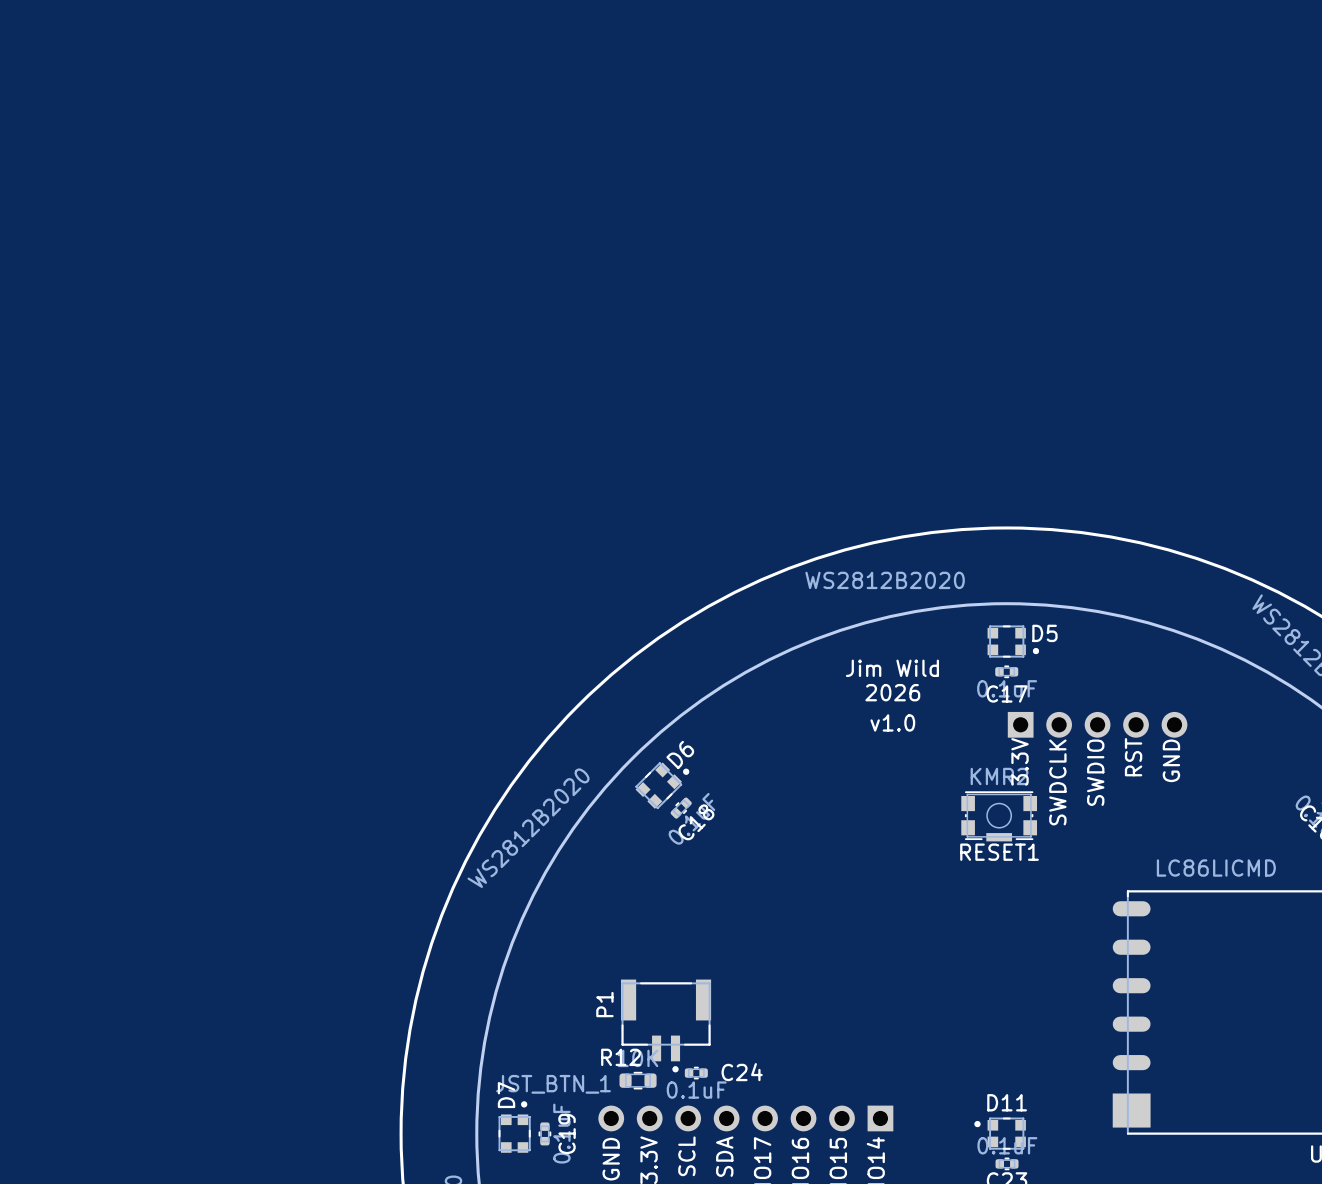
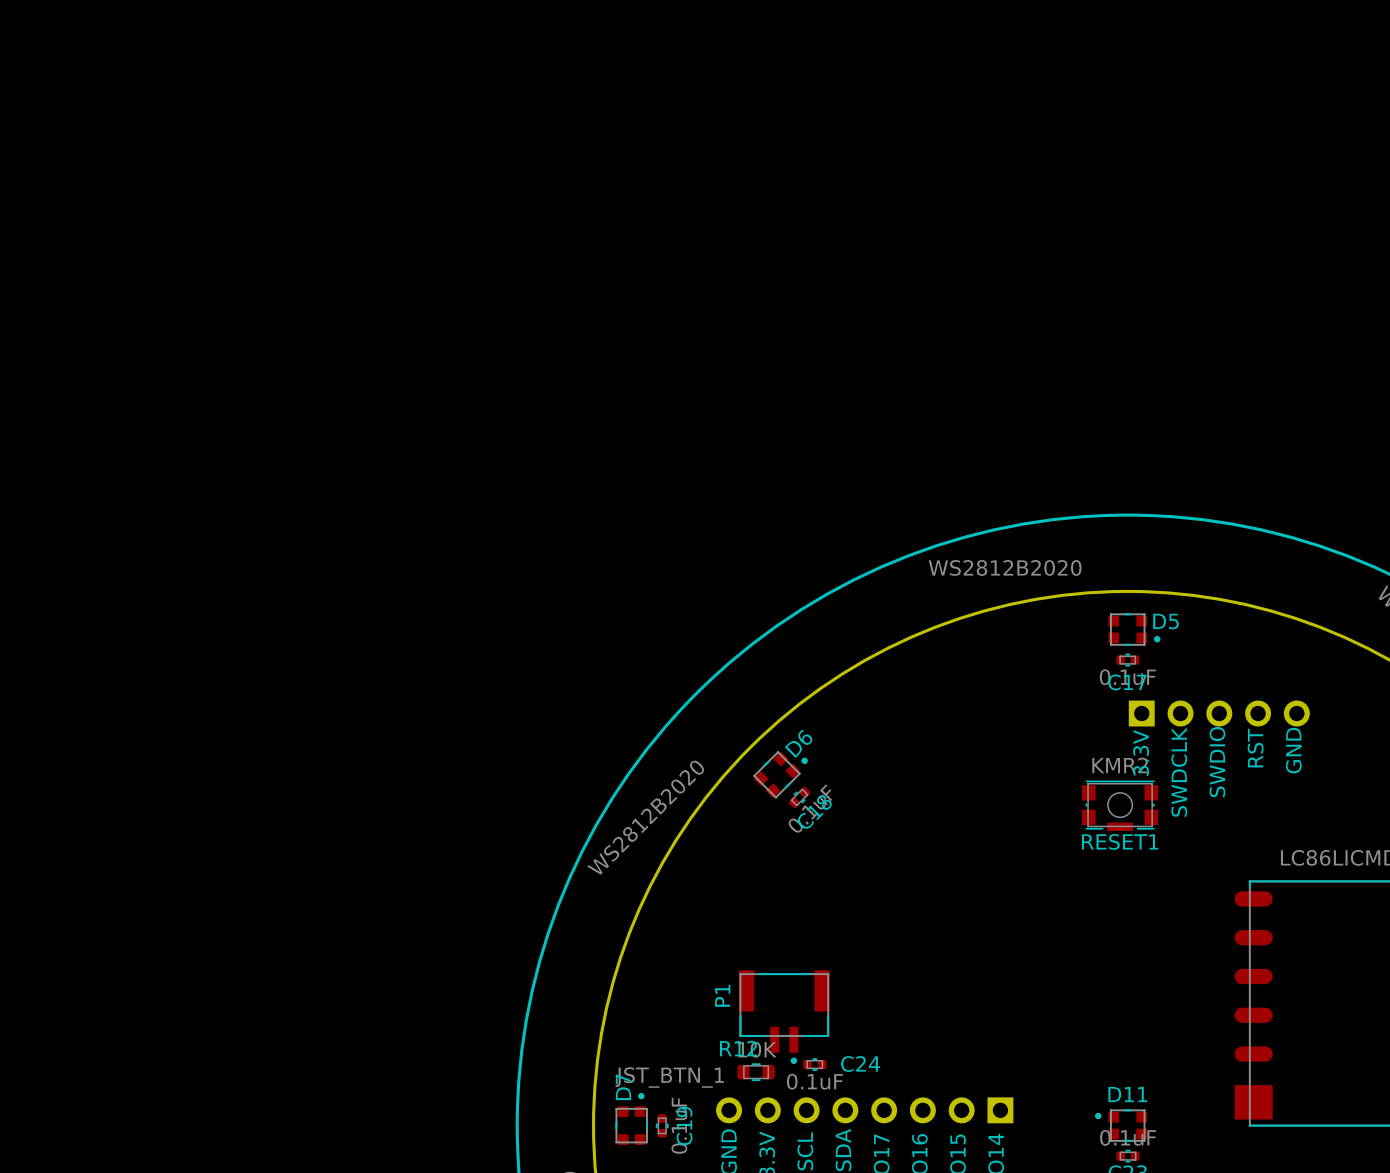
text: Jim Wild (892, 668) -> none
text: 2026 (892, 692) -> none
text: v1.0 (892, 722) -> none

